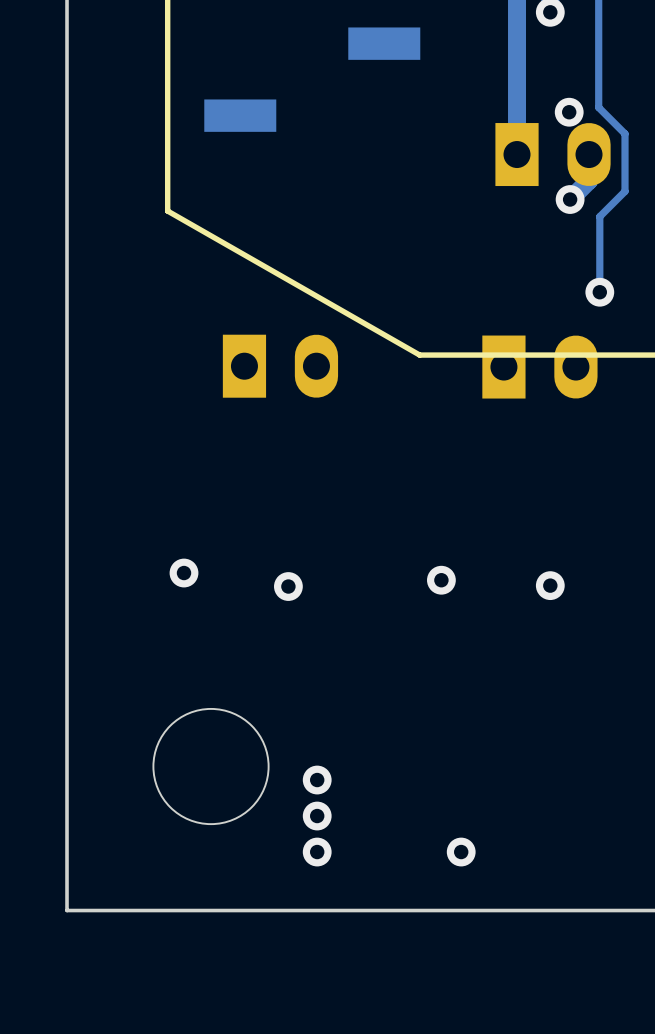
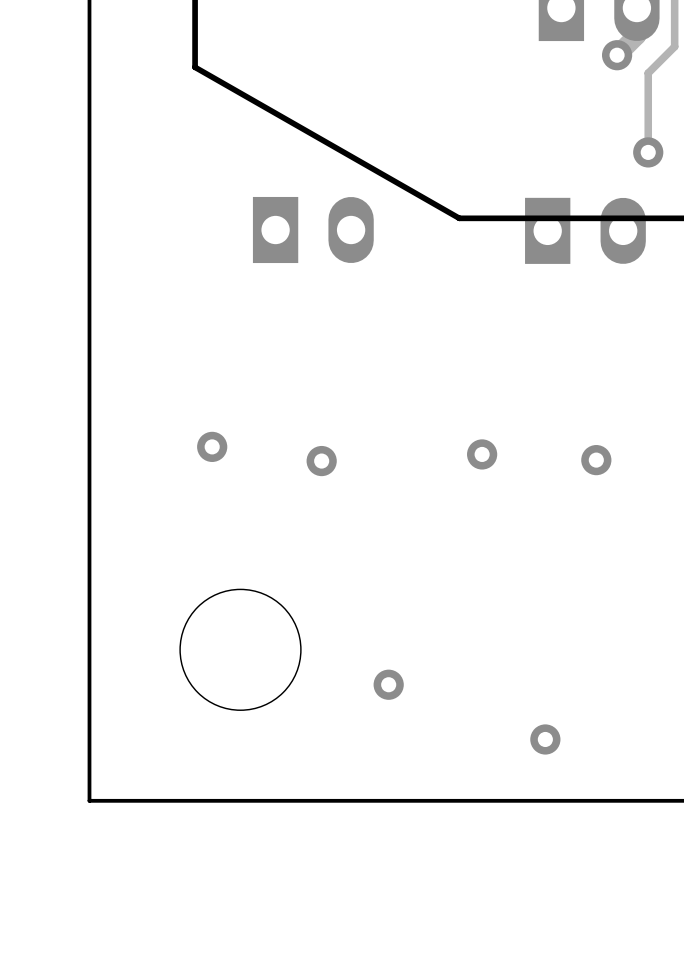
via: (317, 780) -> none
via: none -> (388, 684)
via: (317, 816) -> none
via: (317, 852) -> none
via position: (461, 852) -> (545, 739)

